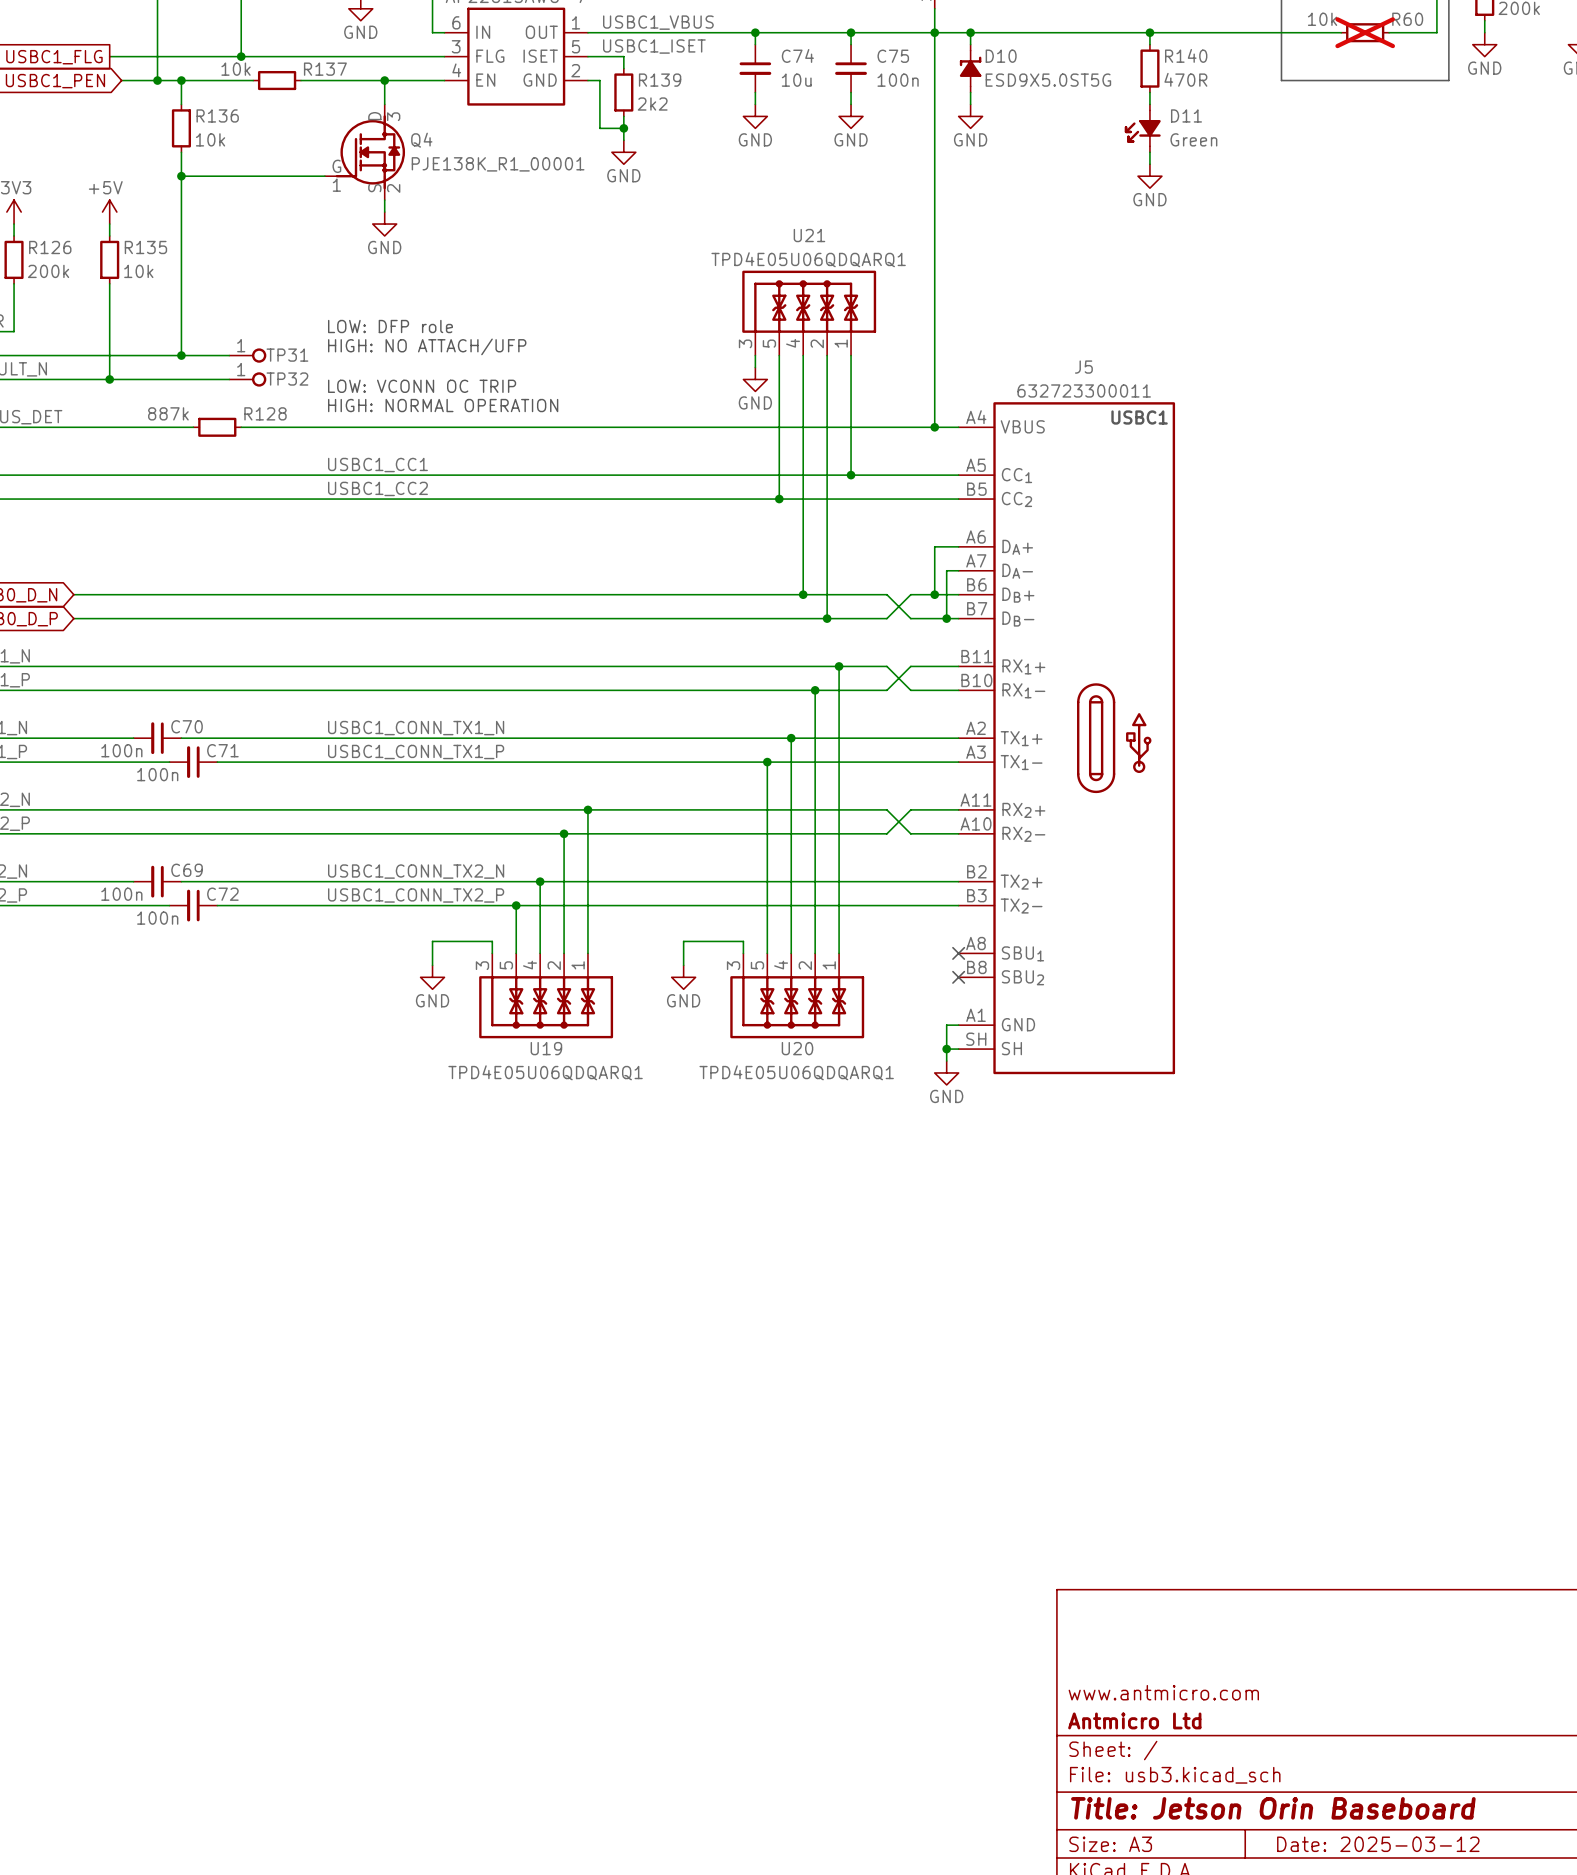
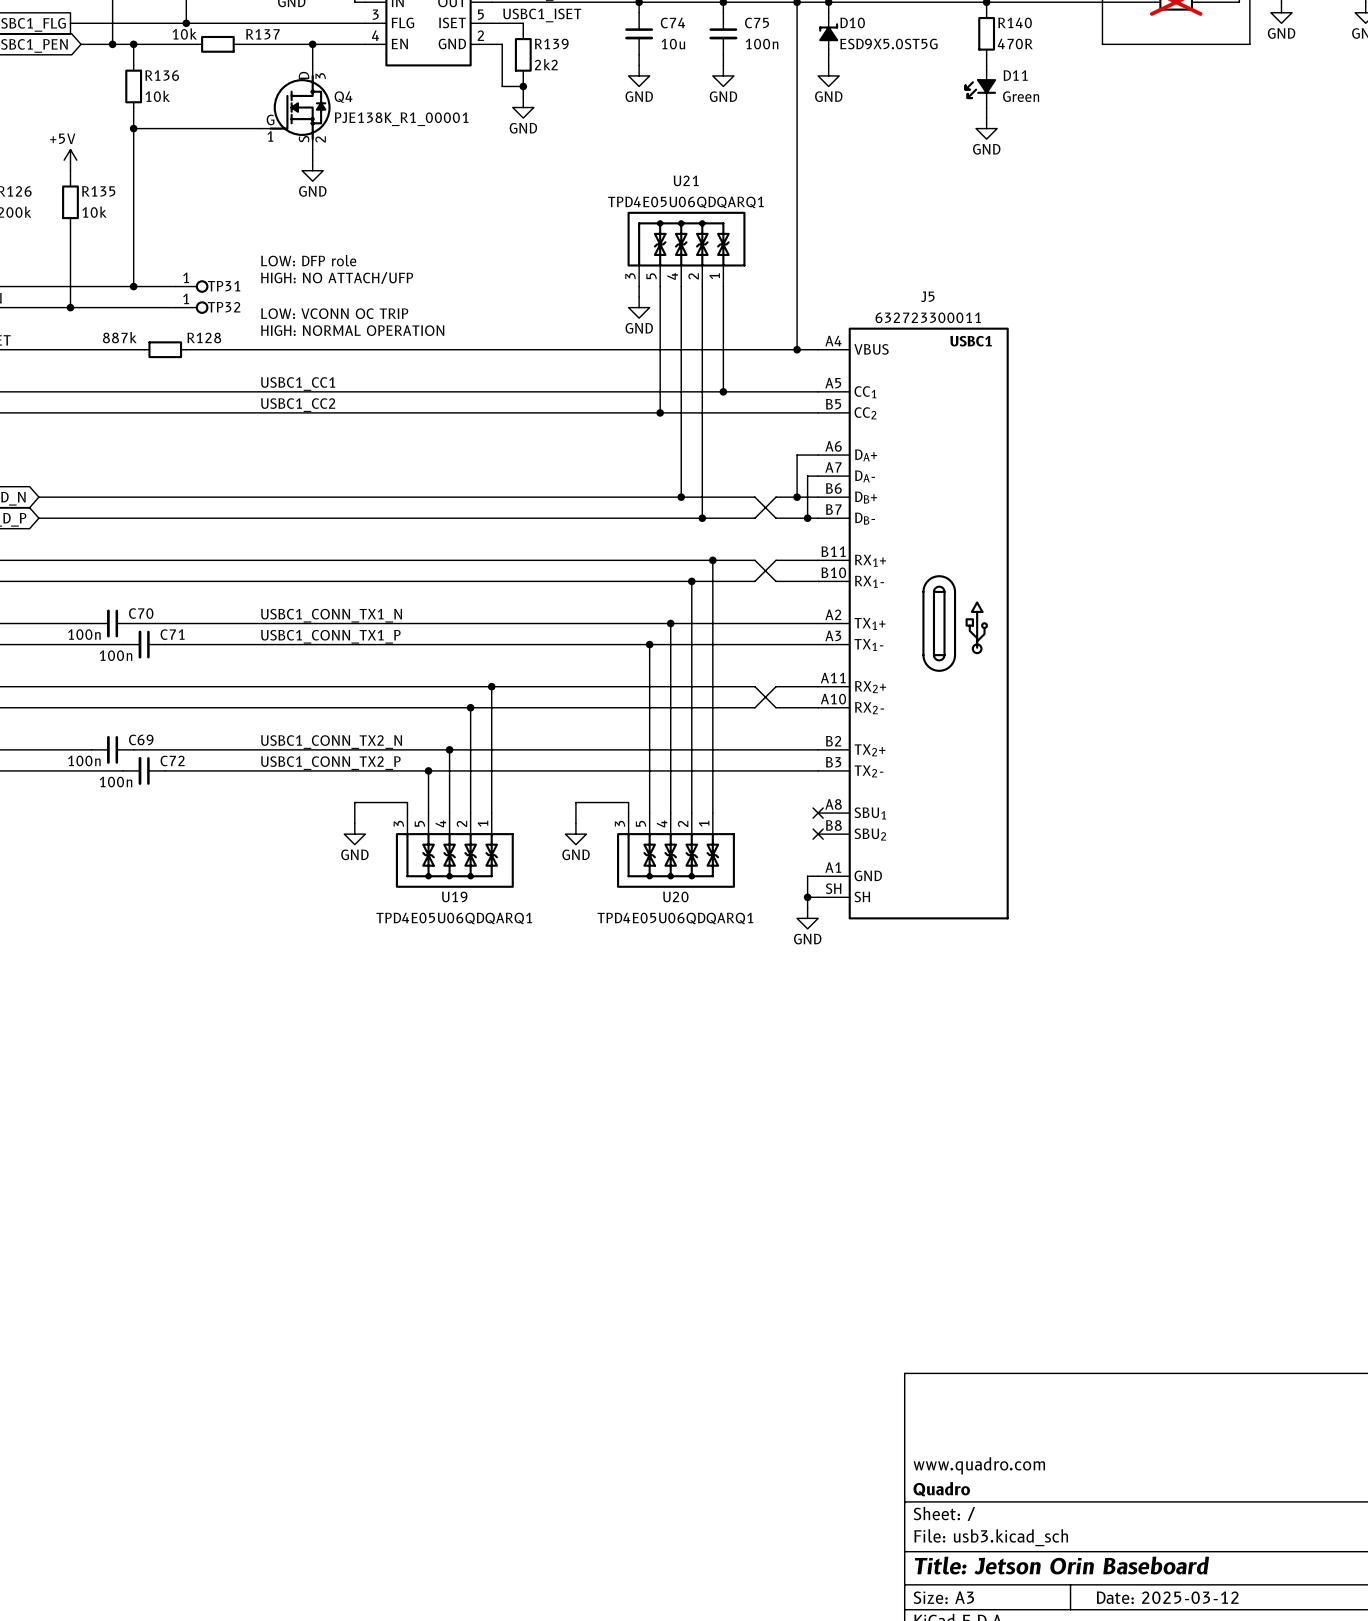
title block: www.antmicro.com (1163, 1692) -> www.quadro.com (979, 1465)
title block: Antmicro Ltd (1134, 1720) -> Quadro (941, 1489)

